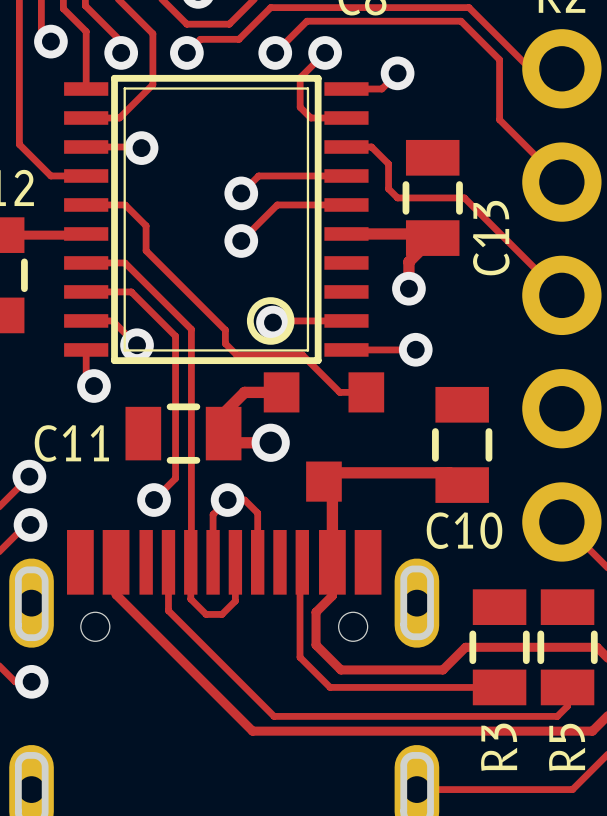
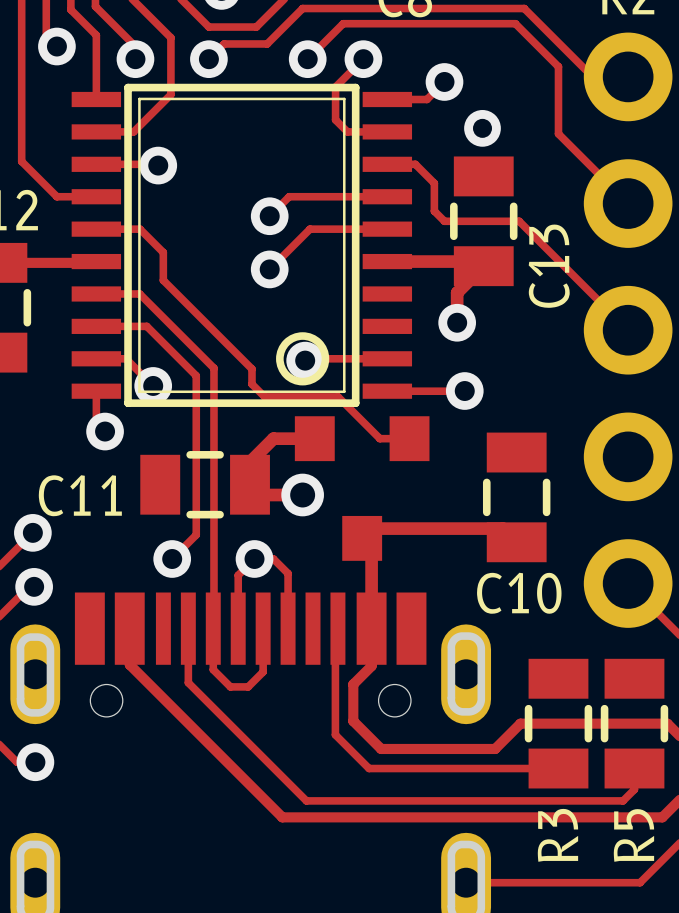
via: none -> (482, 128)

